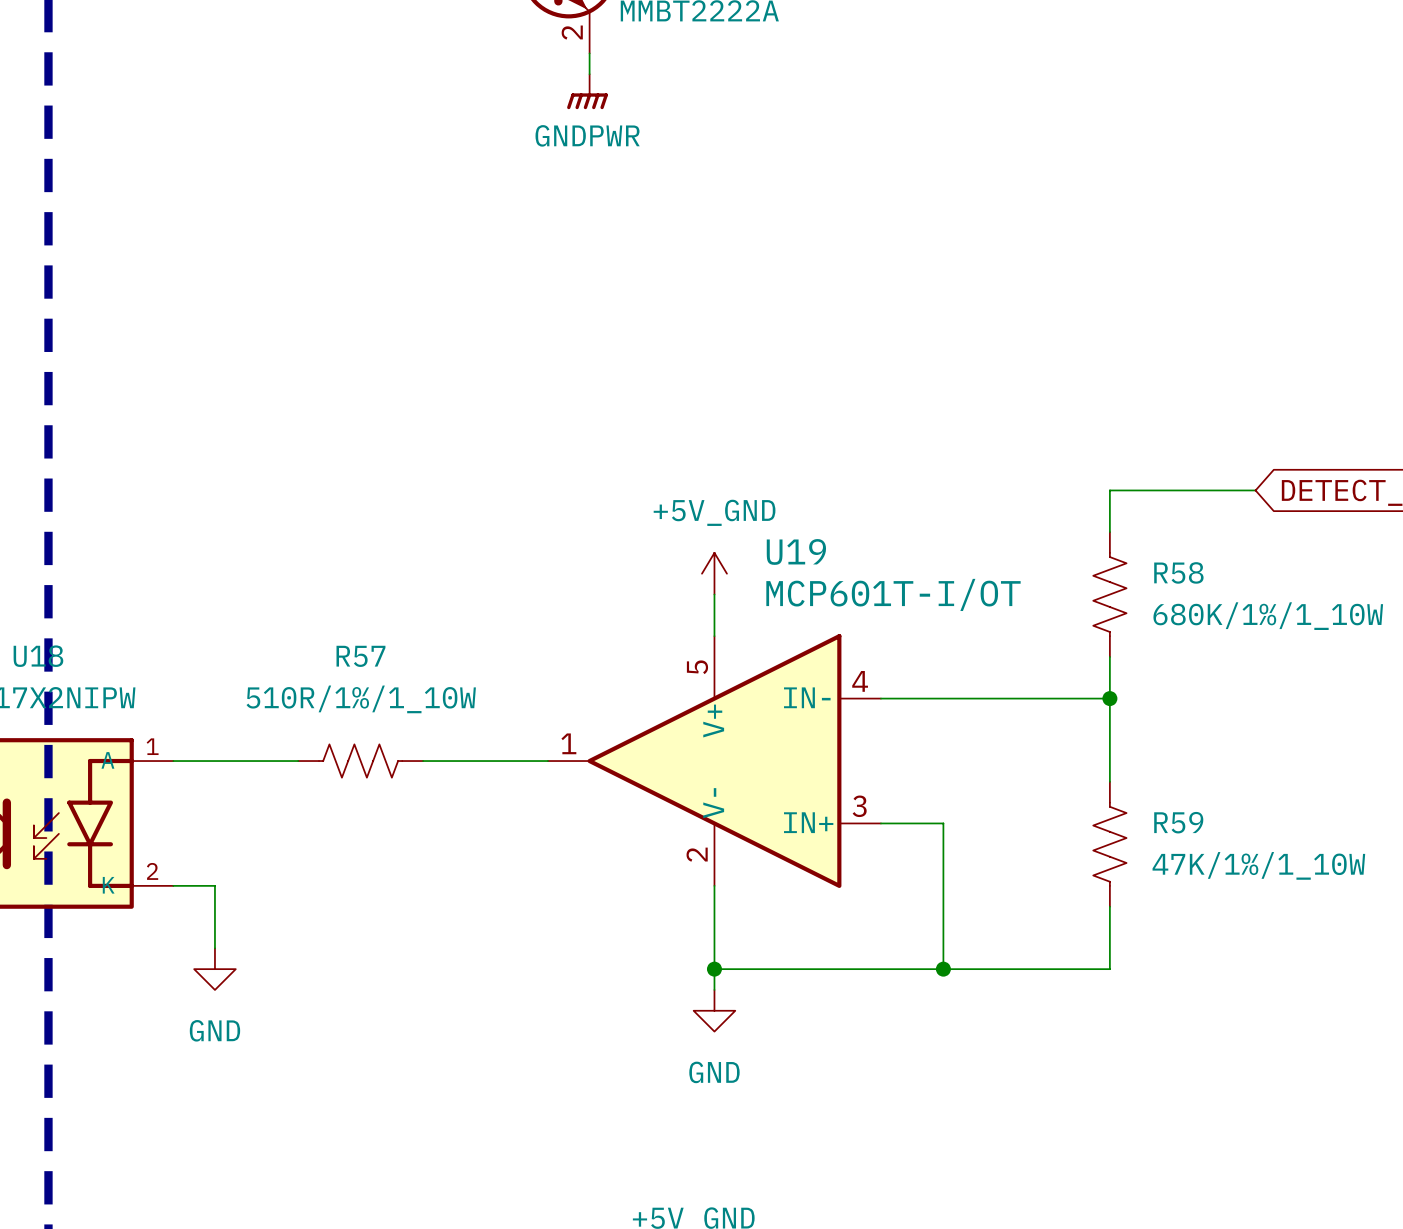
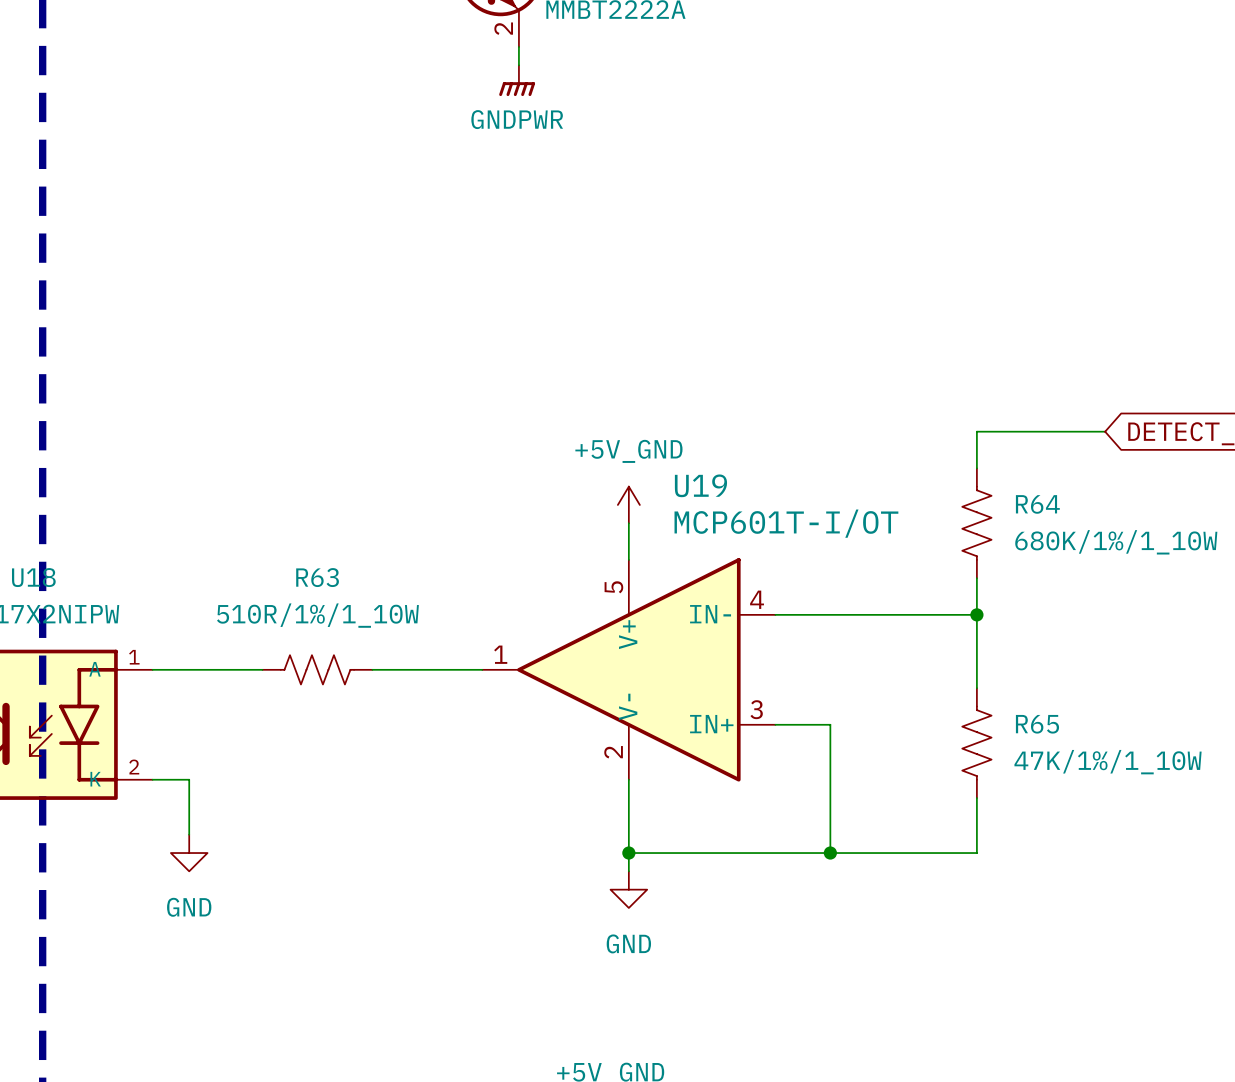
R58 name: R58 (1178, 572) -> R64 (1037, 504)
R57 name: R57 (360, 656) -> R63 (317, 577)
R59 name: R59 (1178, 822) -> R65 (1037, 724)

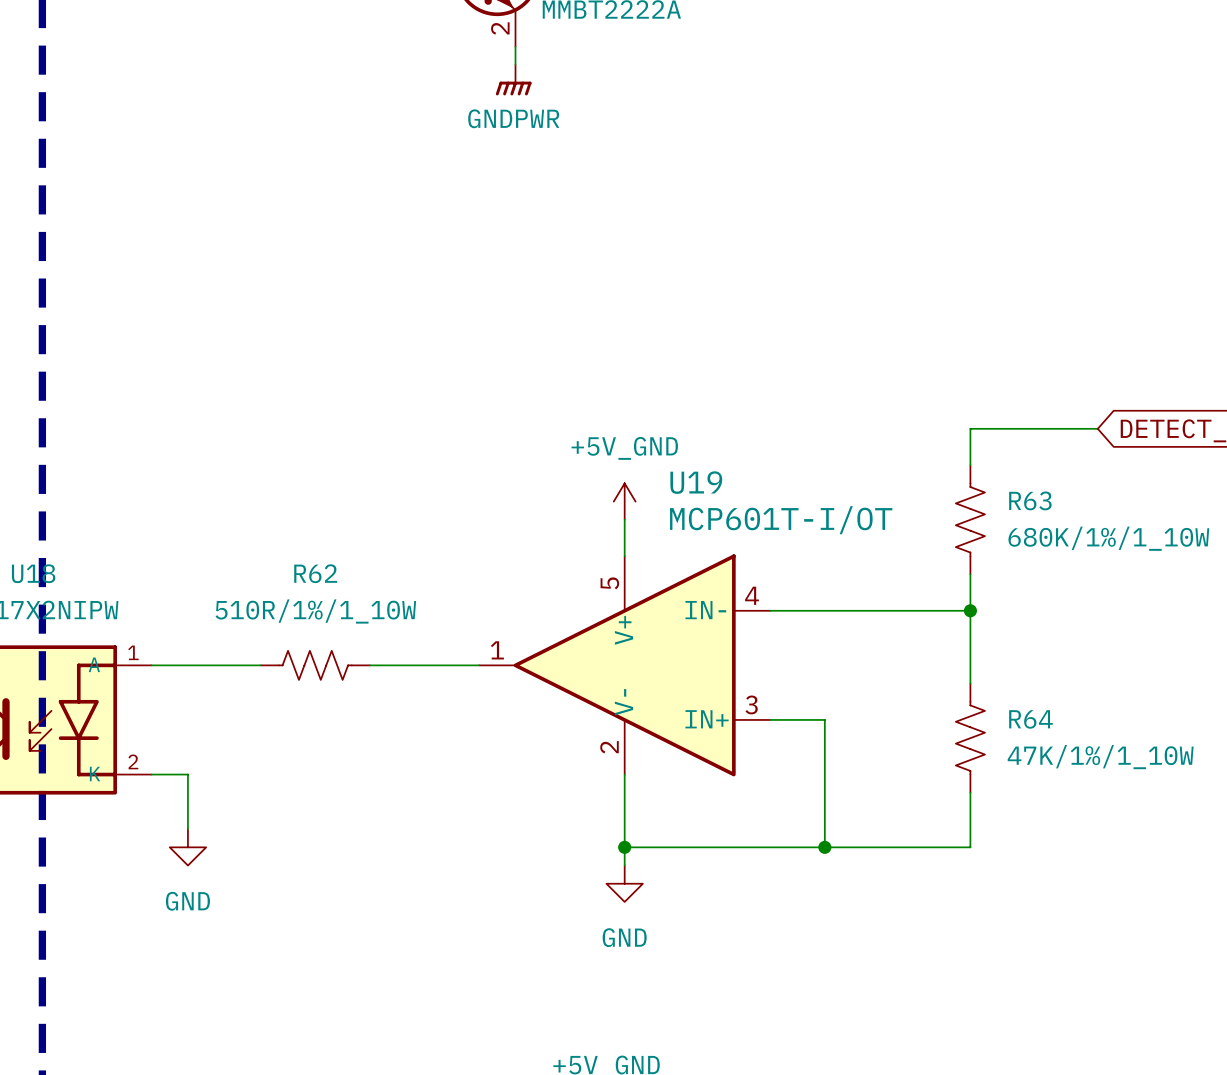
R64 name: R64 (1037, 504) -> R63 (1030, 500)
R63 name: R63 (317, 577) -> R62 (315, 573)
R65 name: R65 (1037, 724) -> R64 (1030, 719)

